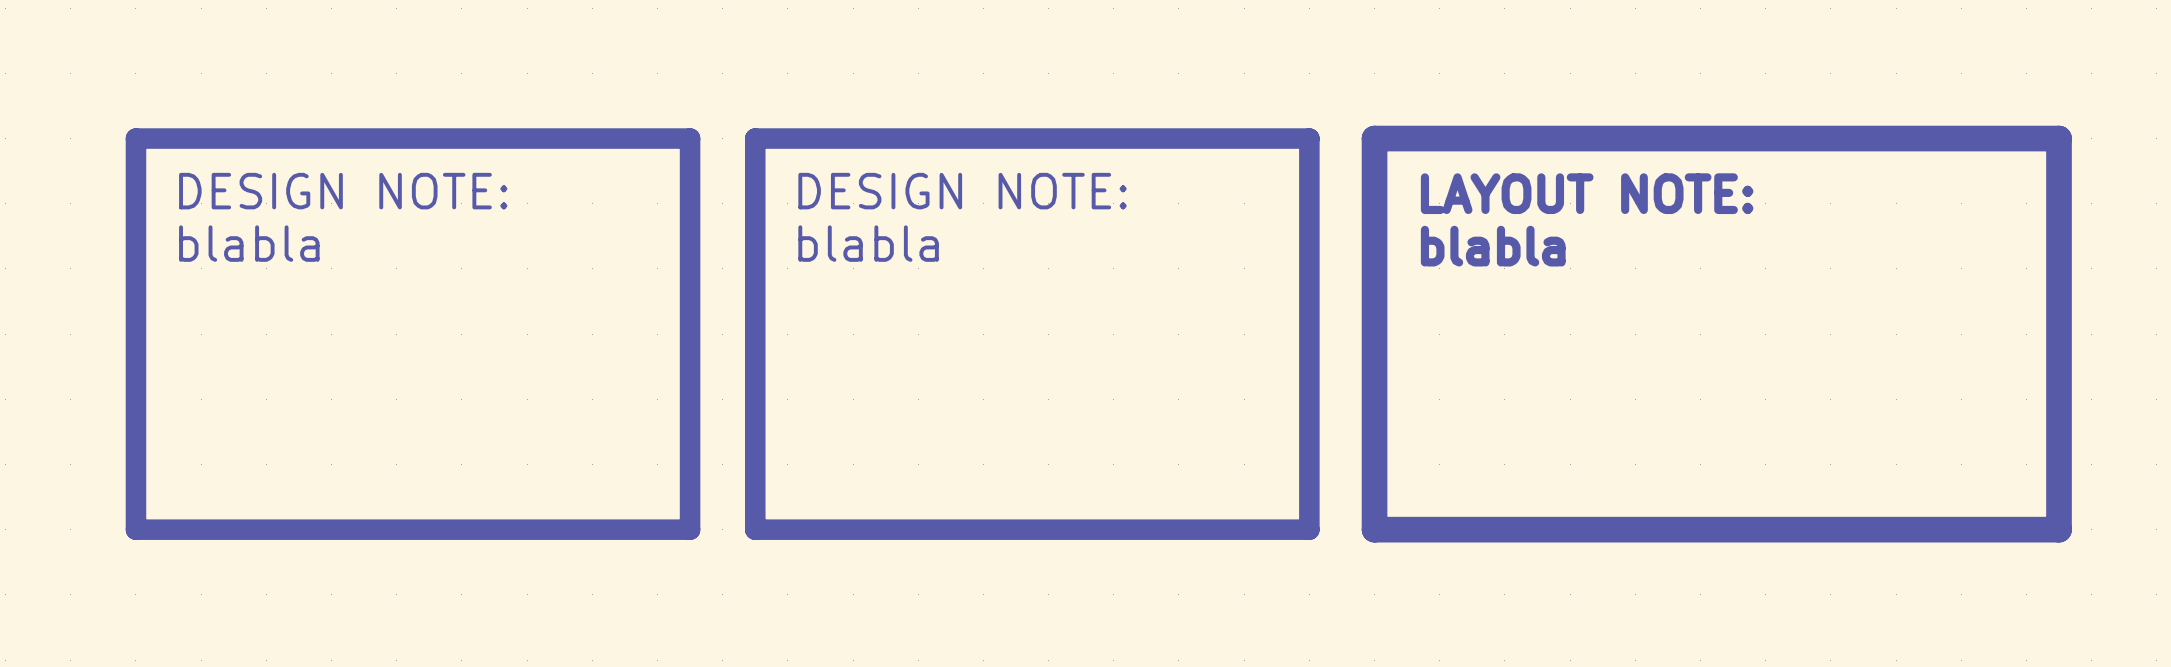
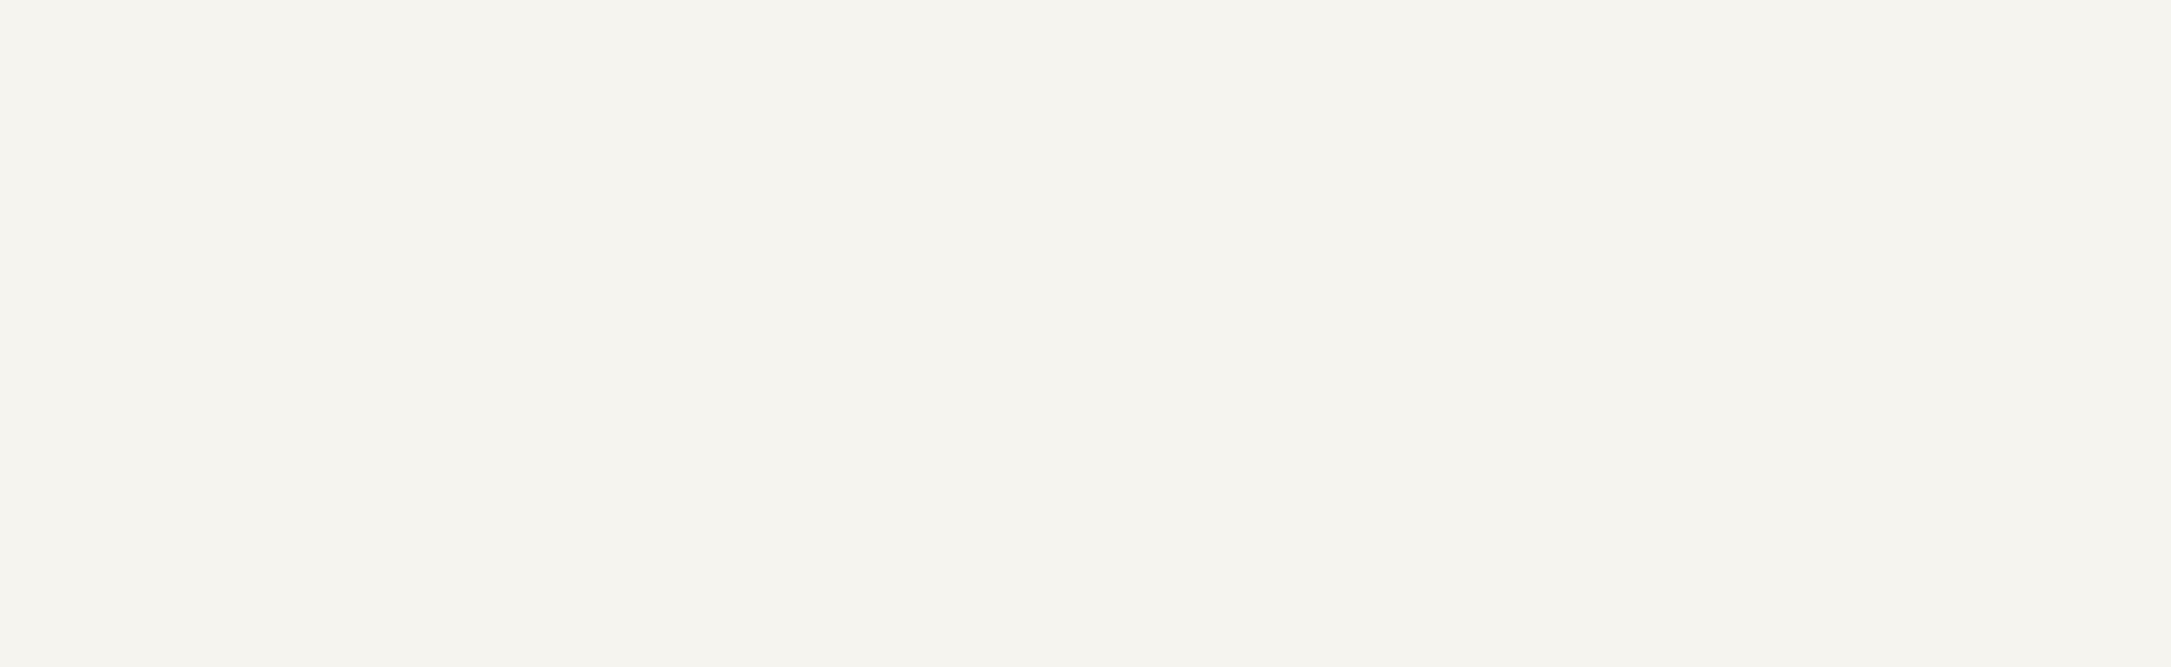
line: (135, 138) (690, 138) (690, 529) (135, 529) (135, 138) -> none
line: (755, 138) (1309, 138) (1309, 529) (755, 529) (755, 138) -> none
line: (1374, 138) (2059, 138) (2059, 529) (1374, 529) (1374, 138) -> none
text: DESIGN NOTE: (343, 191) -> none
text: DESIGN NOTE: (962, 191) -> none
text: LAYOUT NOTE: (1587, 193) -> none
text: blabla (249, 243) -> none
text: blabla (868, 243) -> none
text: blabla (1493, 246) -> none

